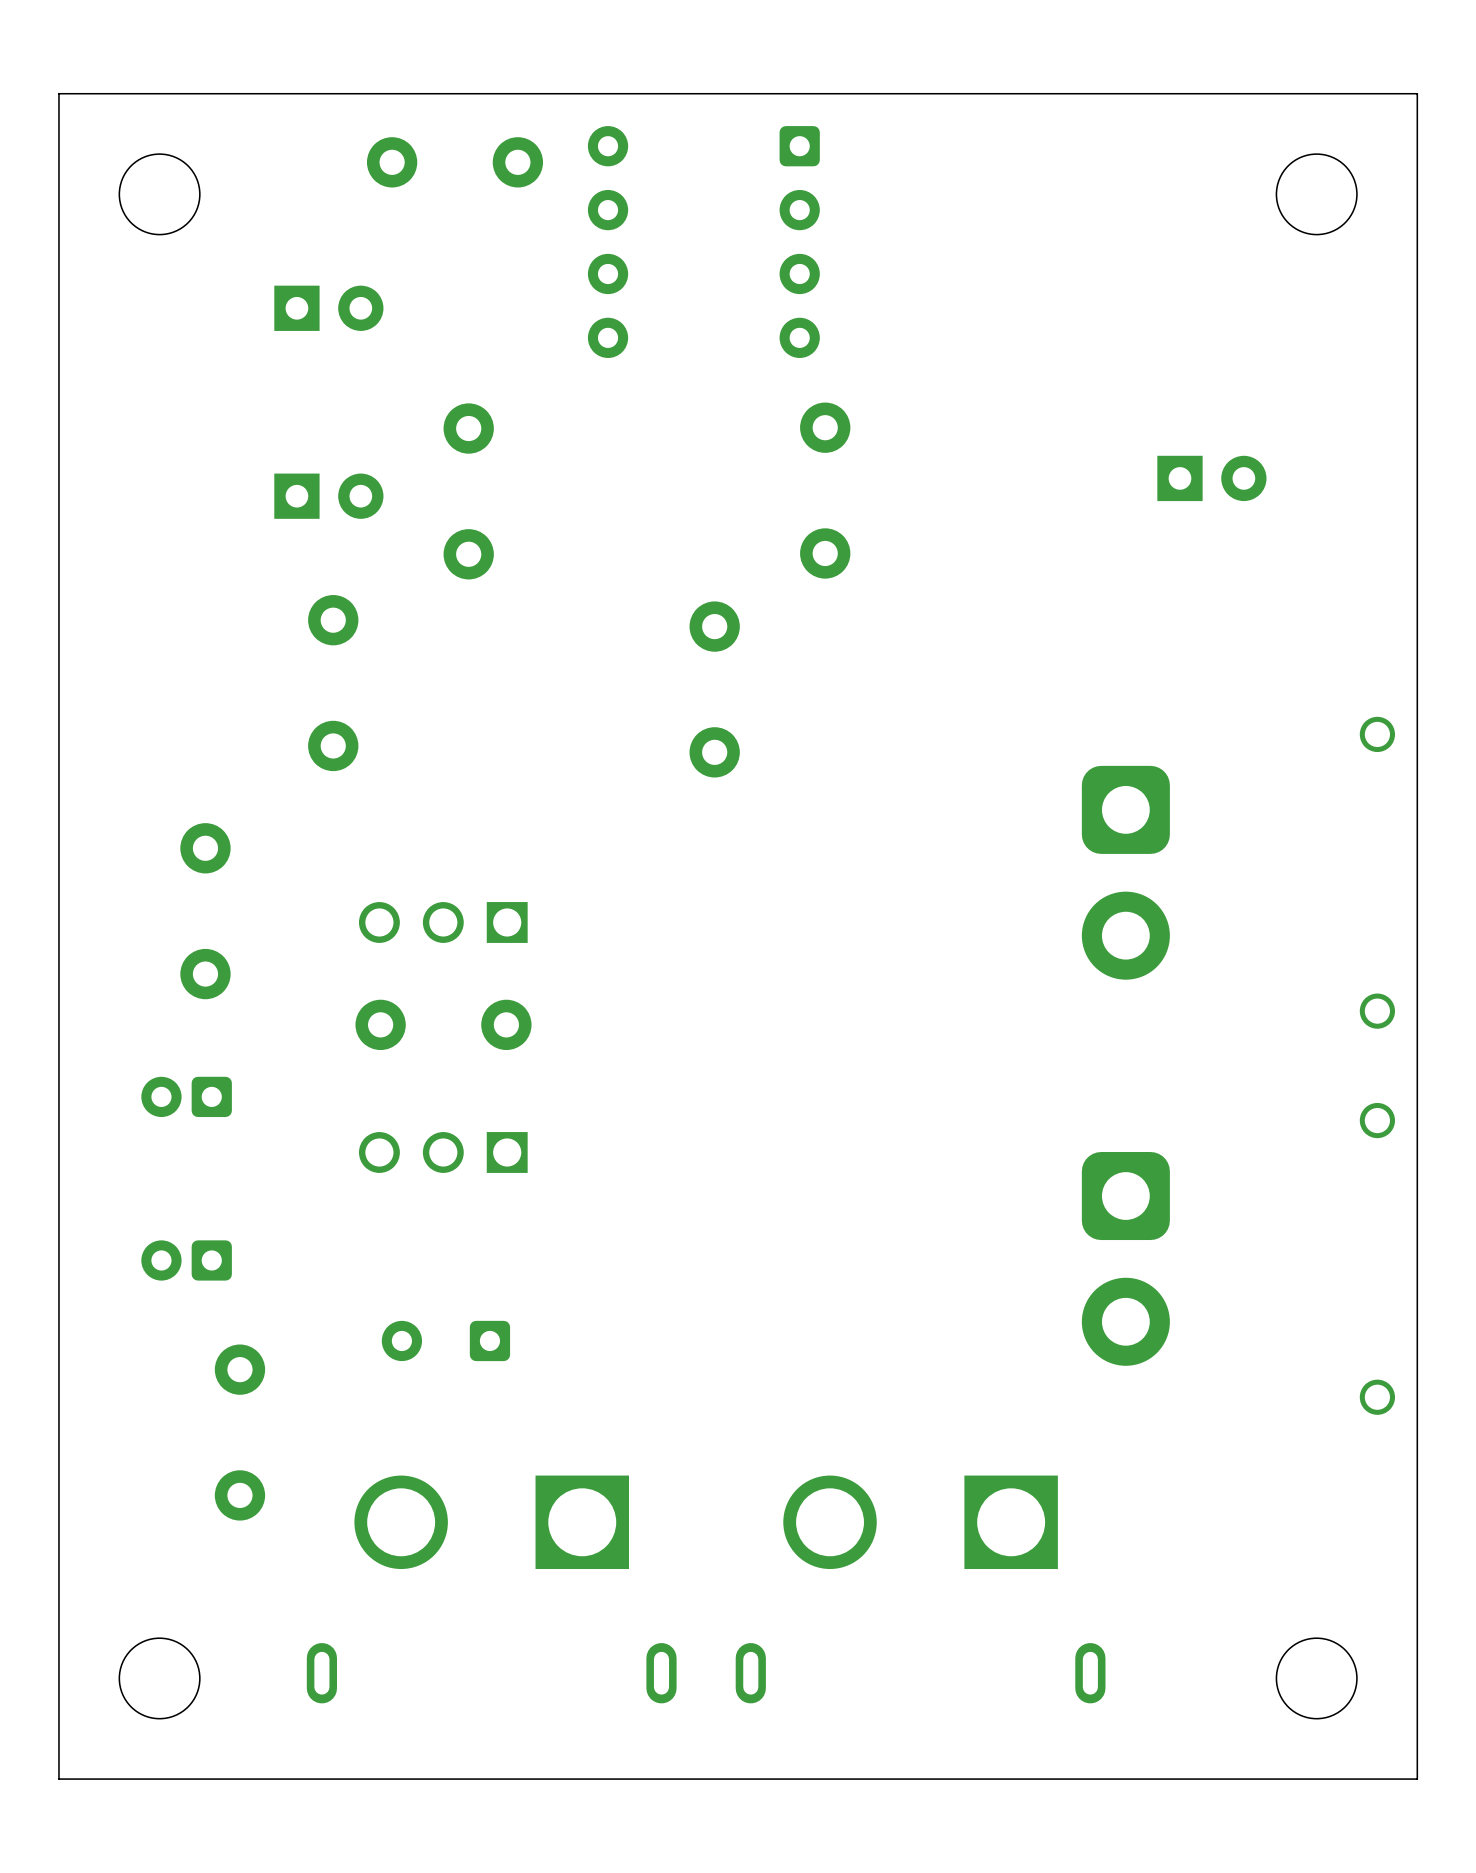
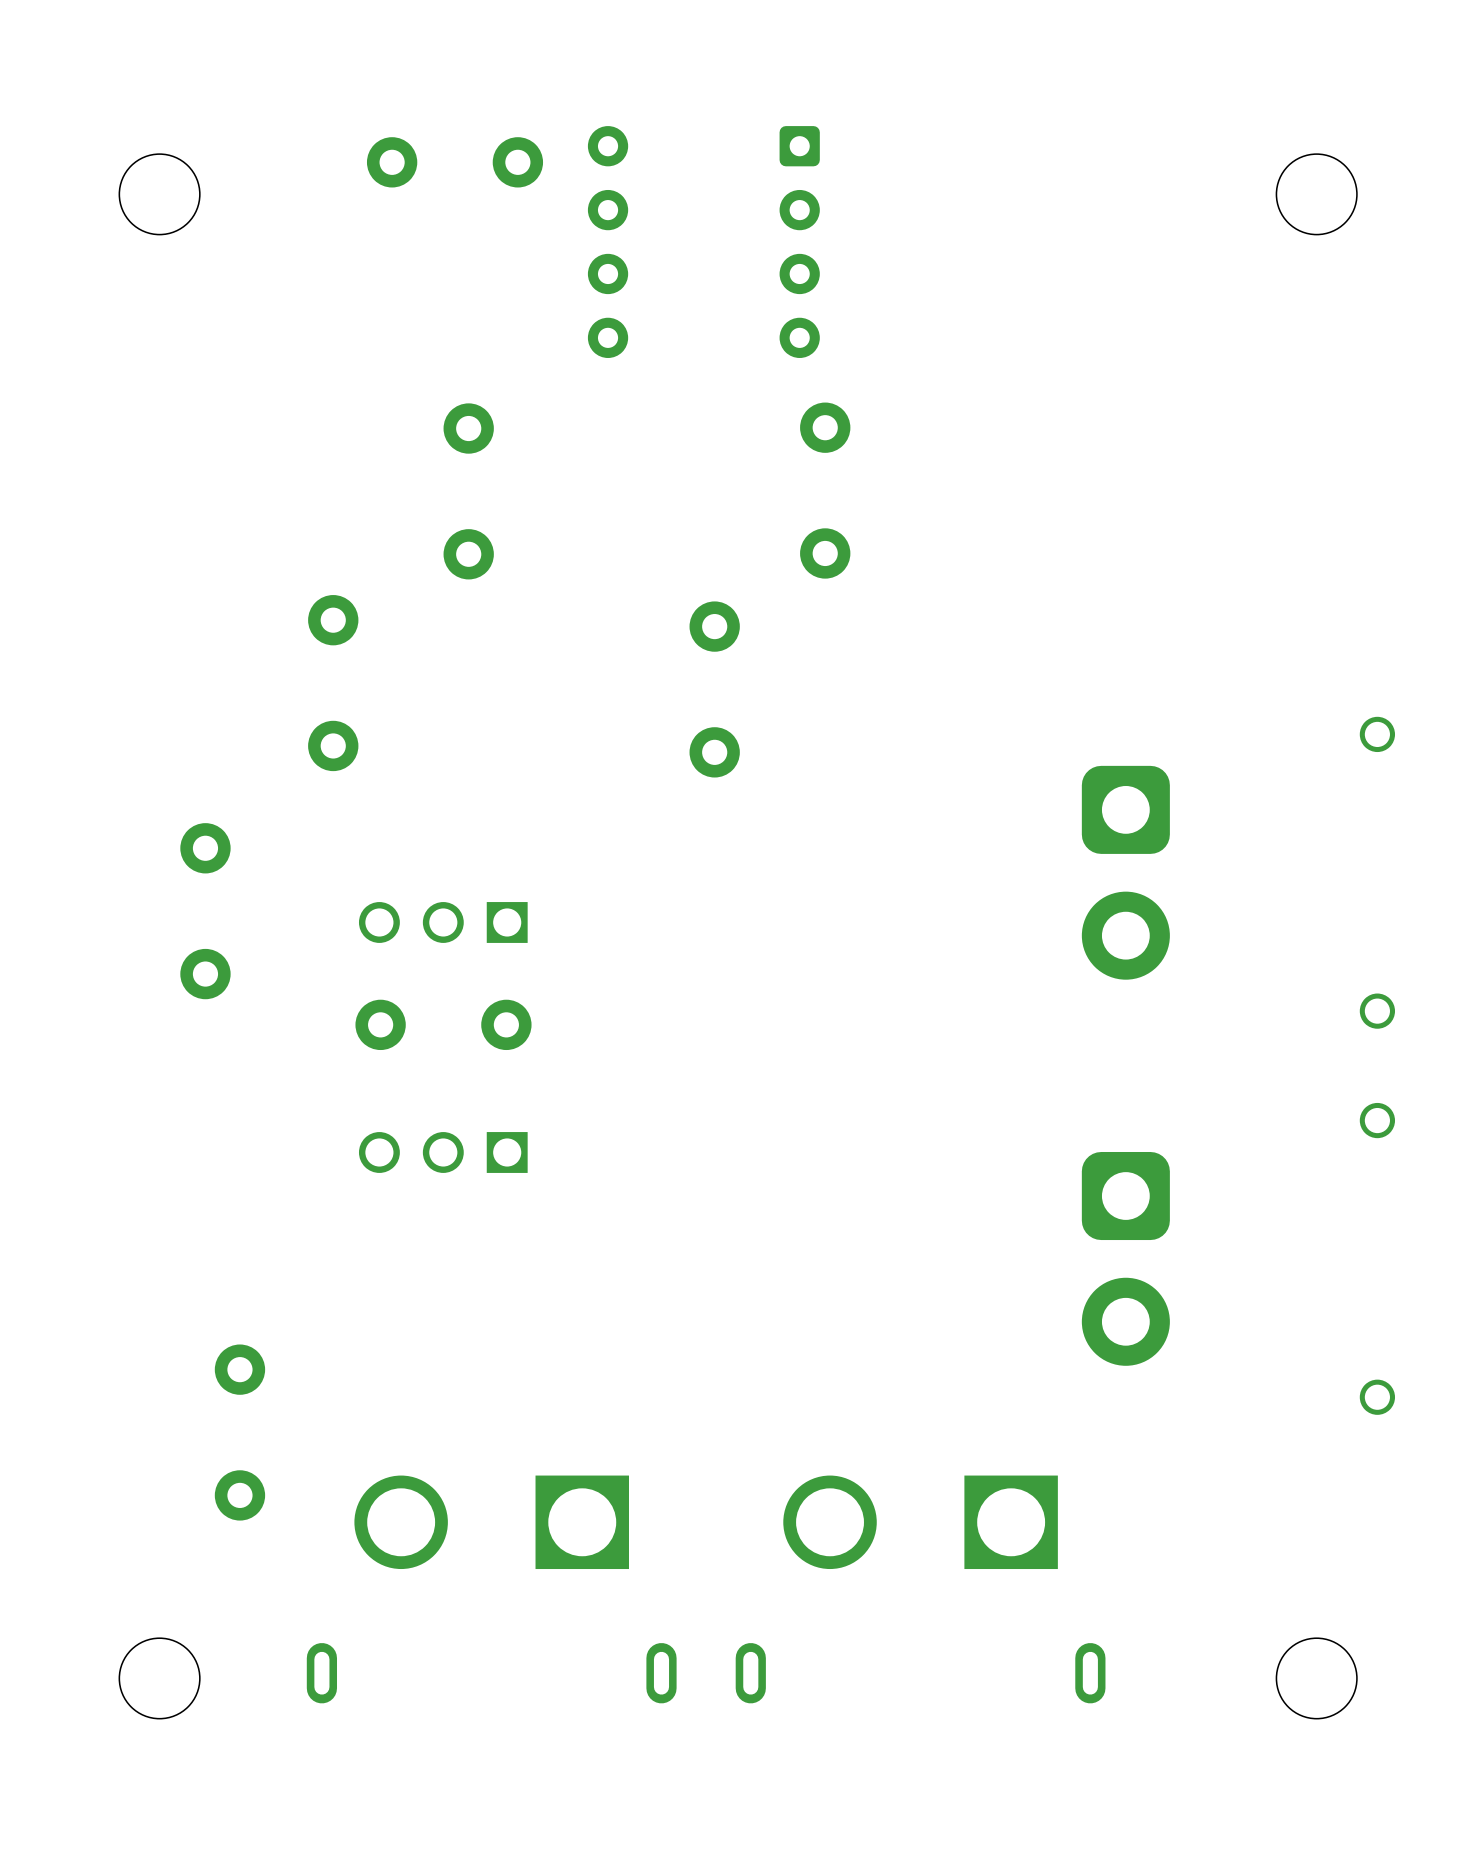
board edge: (1417, 93) (58, 93) (58, 1779) (1417, 1779) (1417, 93) -> none
part: (328, 308) -> none
part: (1211, 478) -> none
part: (328, 496) -> none
part: (186, 1096) -> none
part: (186, 1260) -> none
part: (445, 1340) -> none

